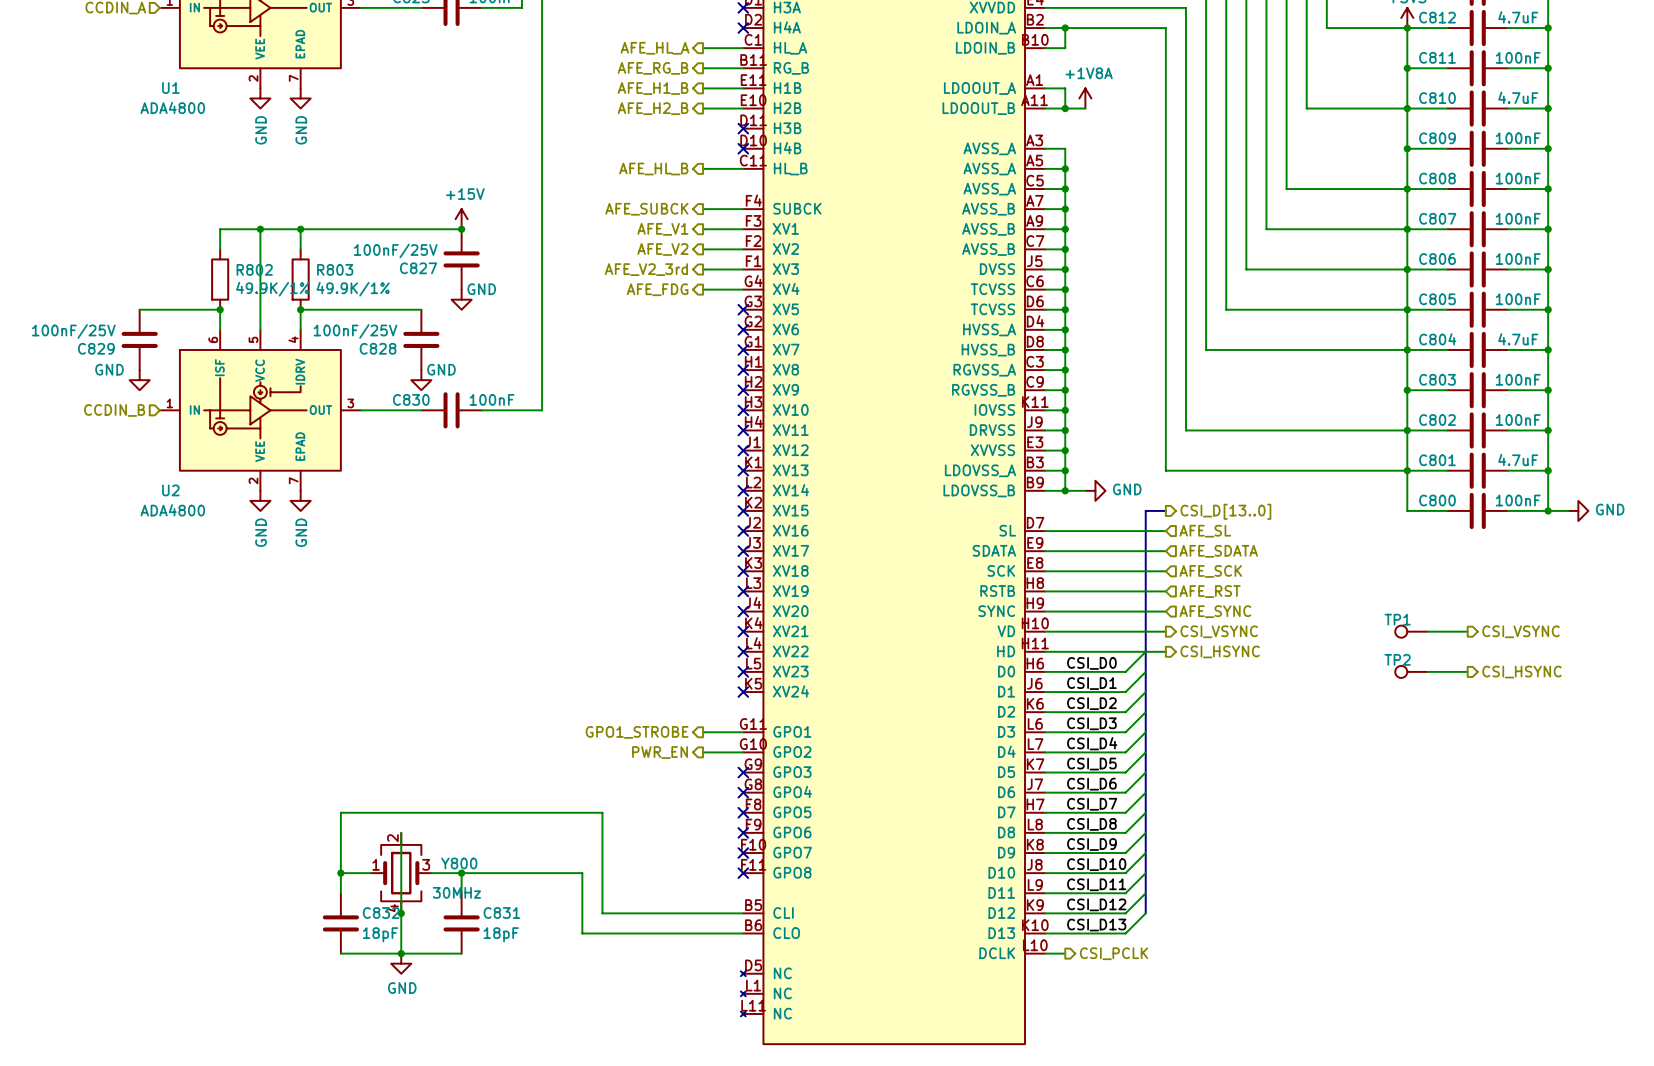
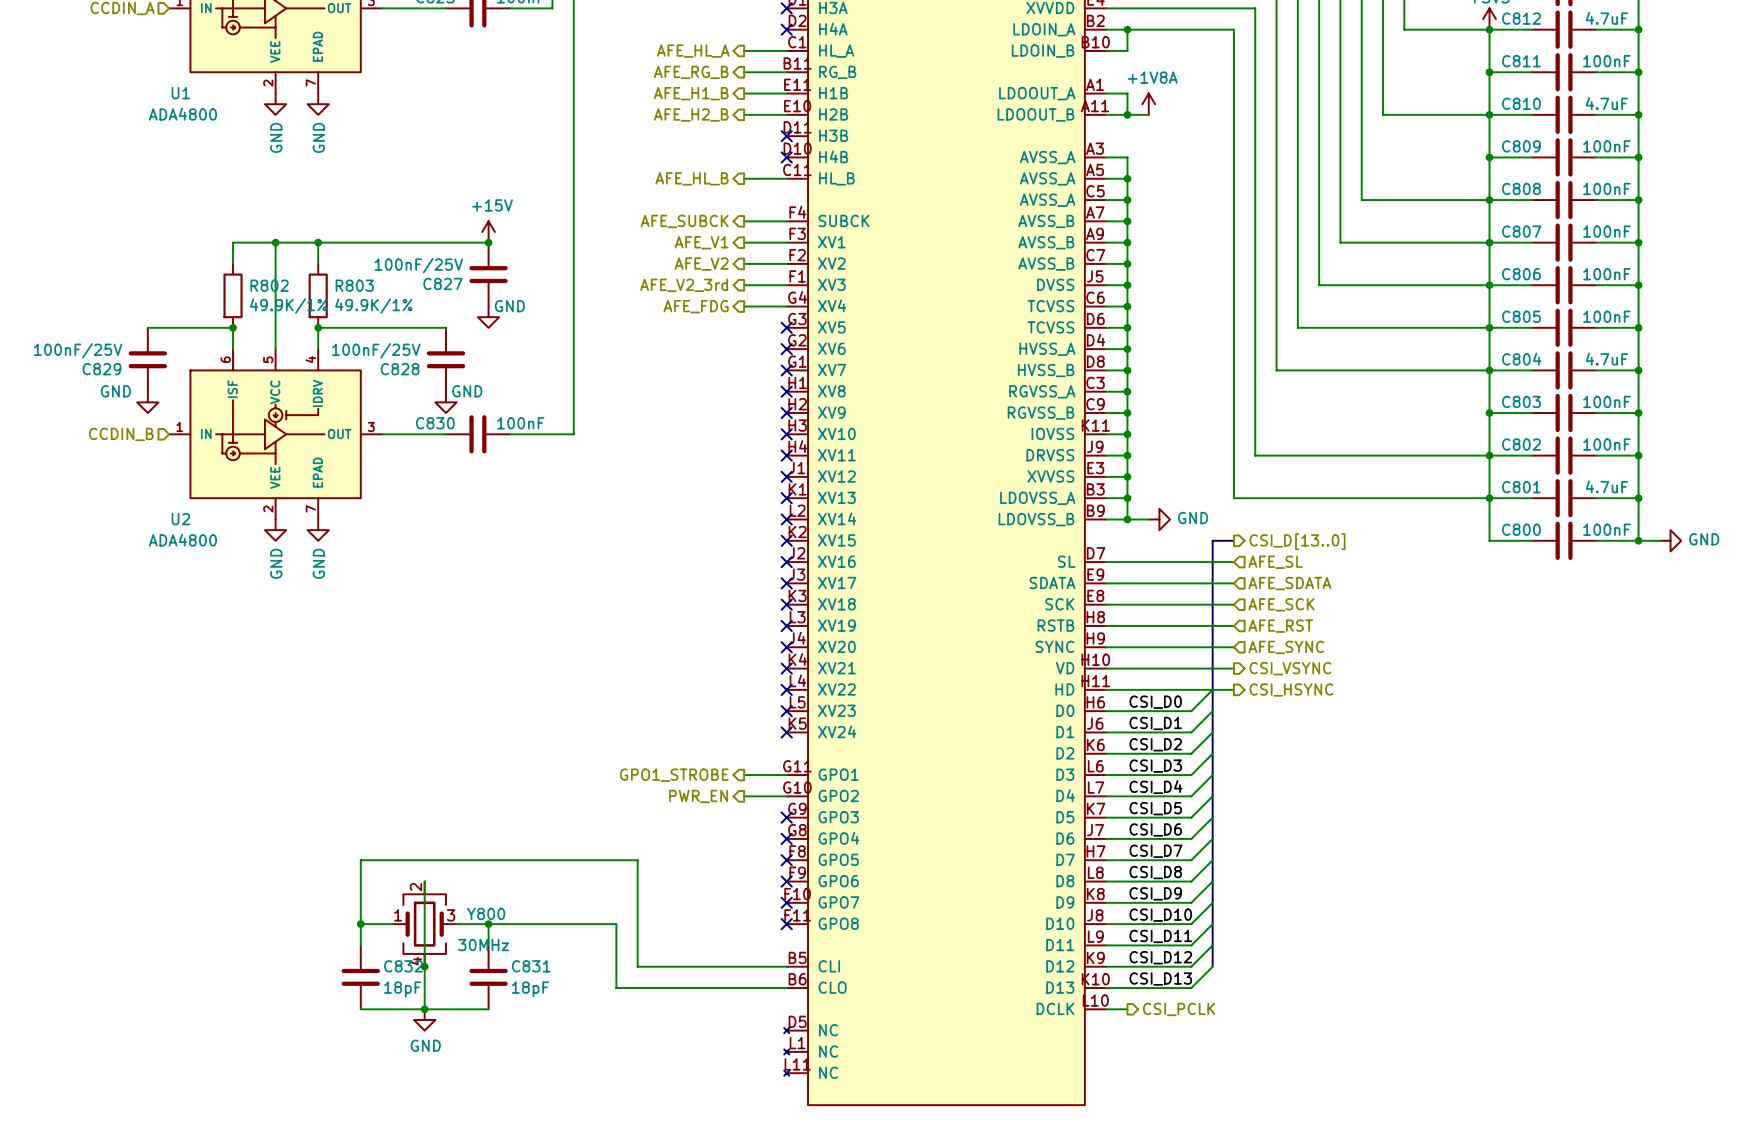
TP1: (1411, 631) -> none
wire: (1427, 631) (1467, 631) -> none
hierarchical label: CSI_VSYNC (1521, 631) -> none
TP2: (1411, 671) -> none
wire: (1427, 671) (1467, 671) -> none
hierarchical label: CSI_HSYNC (1521, 672) -> none

